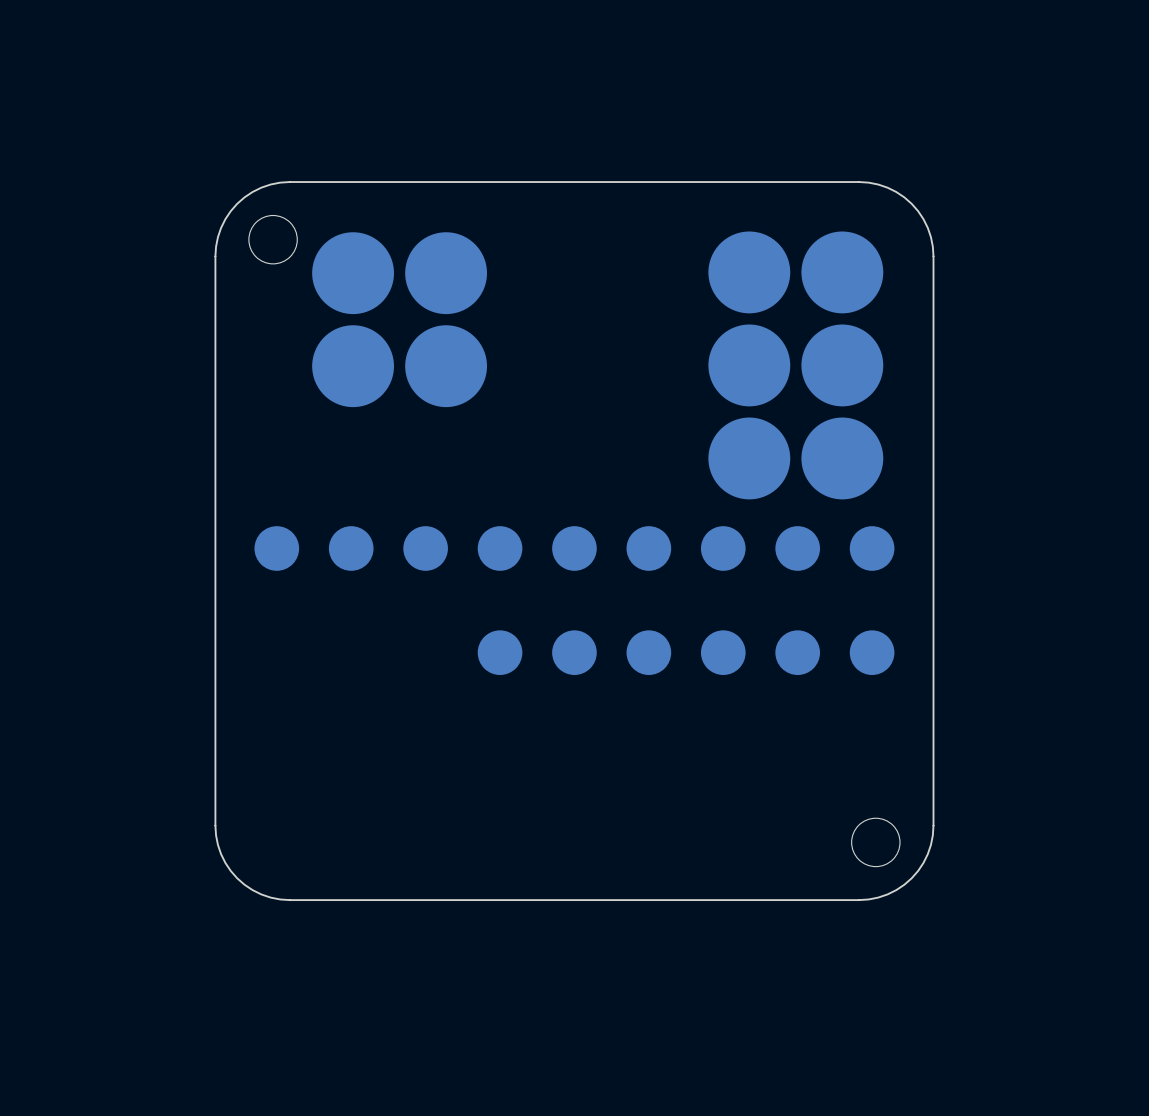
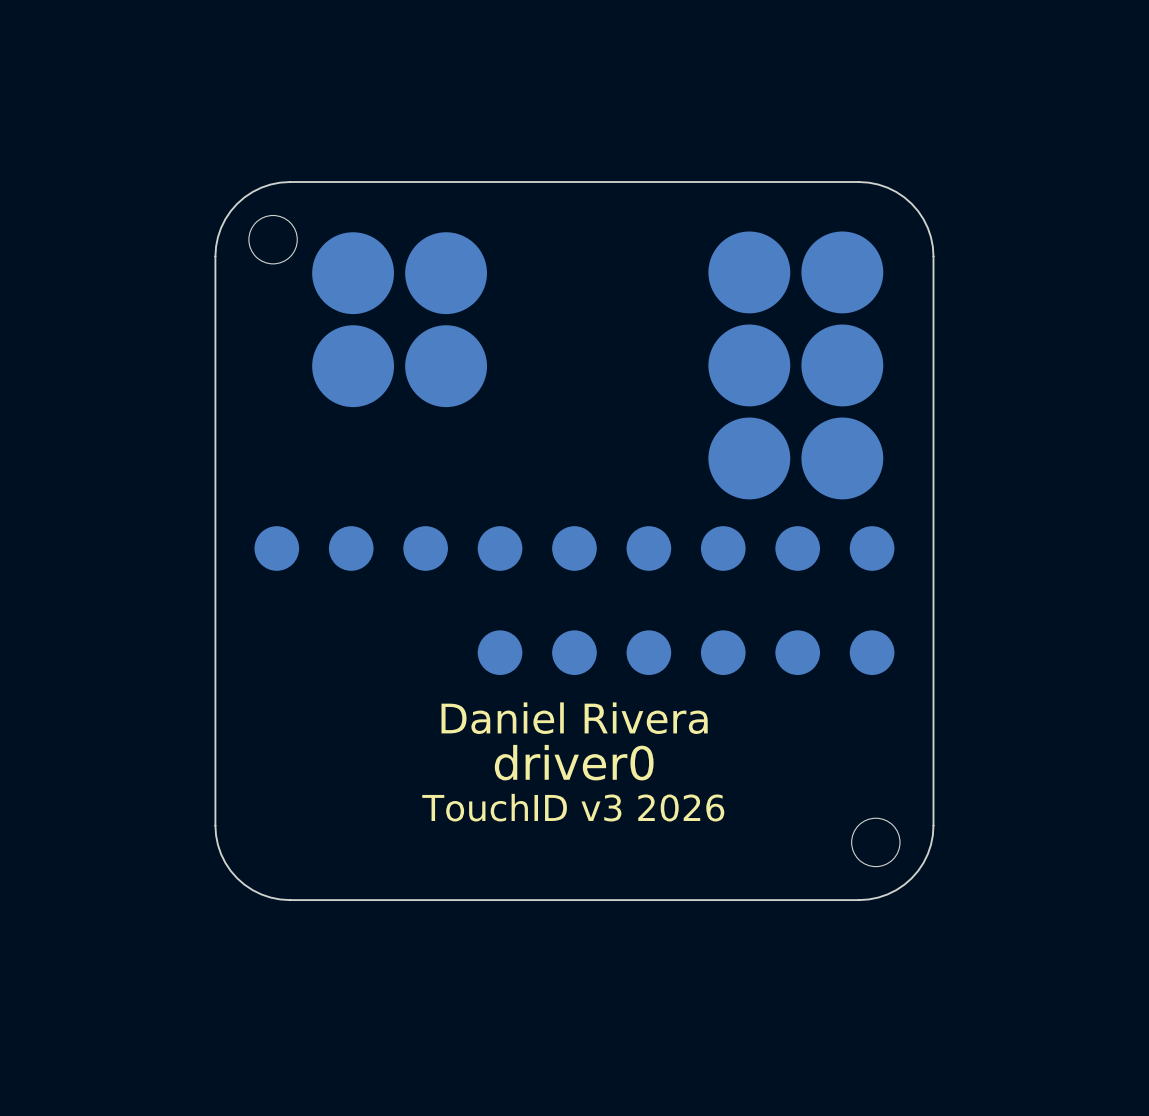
text: none -> Daniel Rivera (574, 718)
text: none -> driver0 (574, 762)
text: none -> TouchID v3 2026 (573, 807)

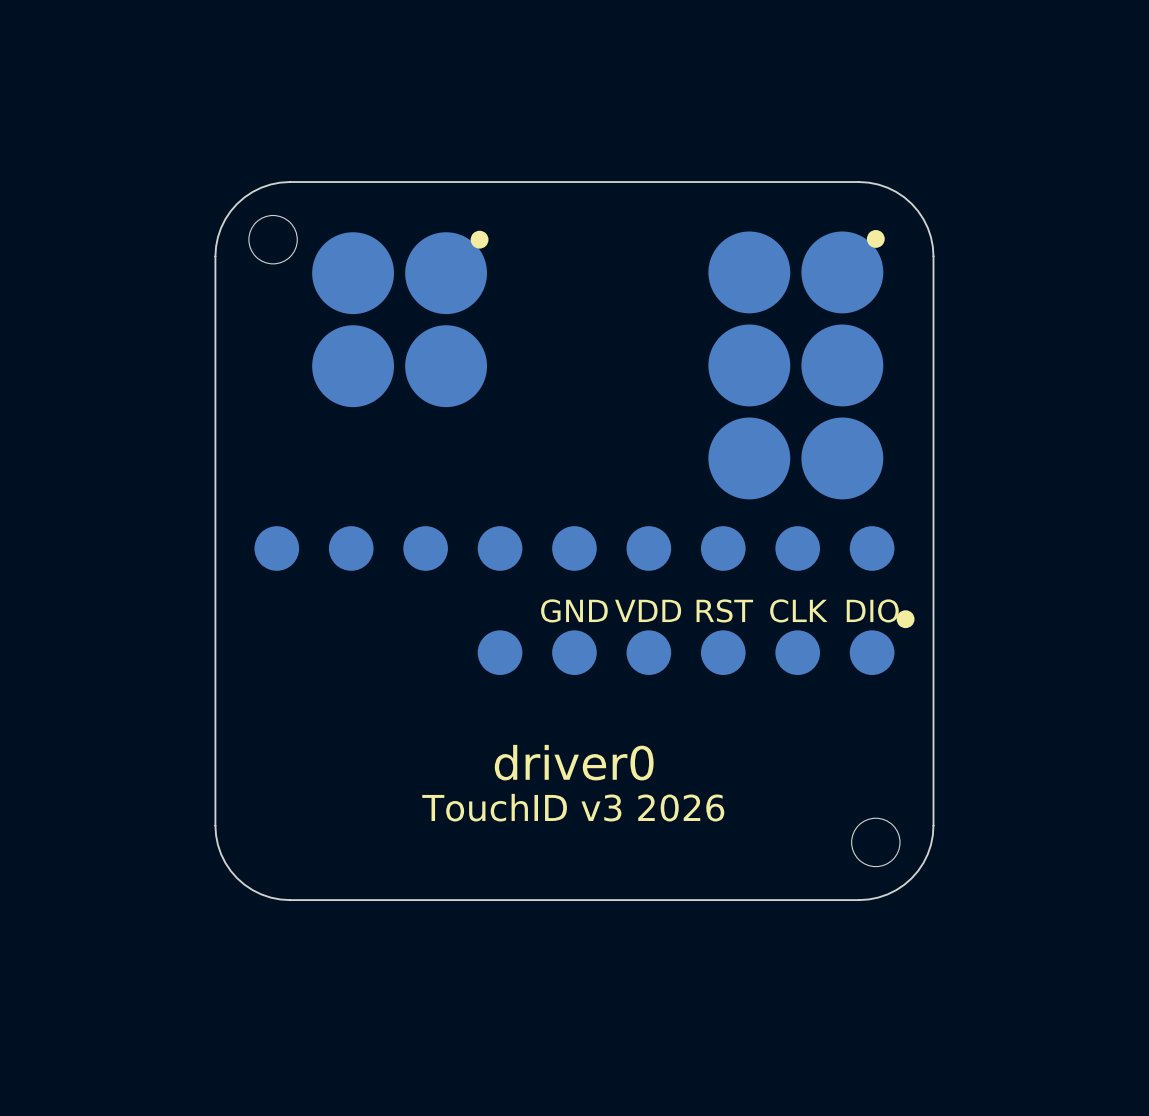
drawing: none -> [470, 230, 489, 249]
drawing: none -> [866, 230, 885, 248]
text: none -> GND (574, 610)
text: none -> VDD (648, 610)
text: none -> RST (724, 610)
text: none -> CLK (798, 610)
text: none -> DIO (872, 610)
drawing: none -> [896, 610, 915, 629]
text: Daniel Rivera (574, 718) -> none

